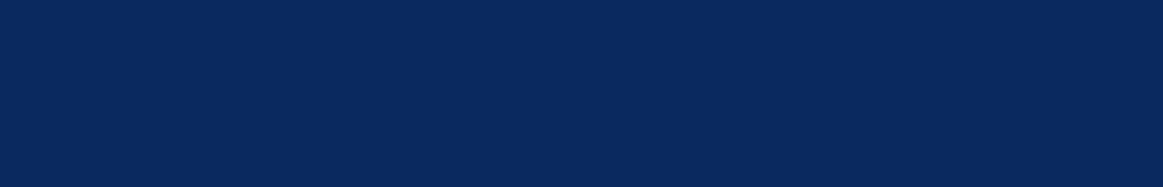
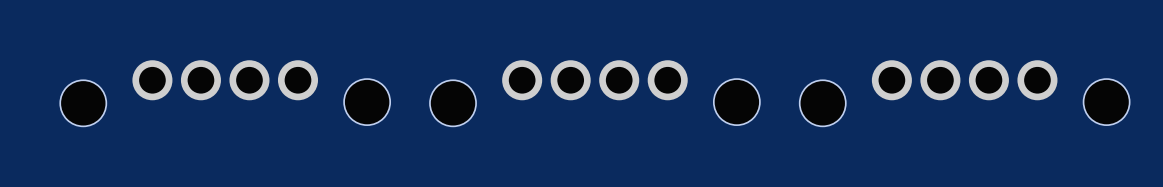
part: none -> (225, 93)
part: none -> (594, 93)
part: none -> (964, 93)

